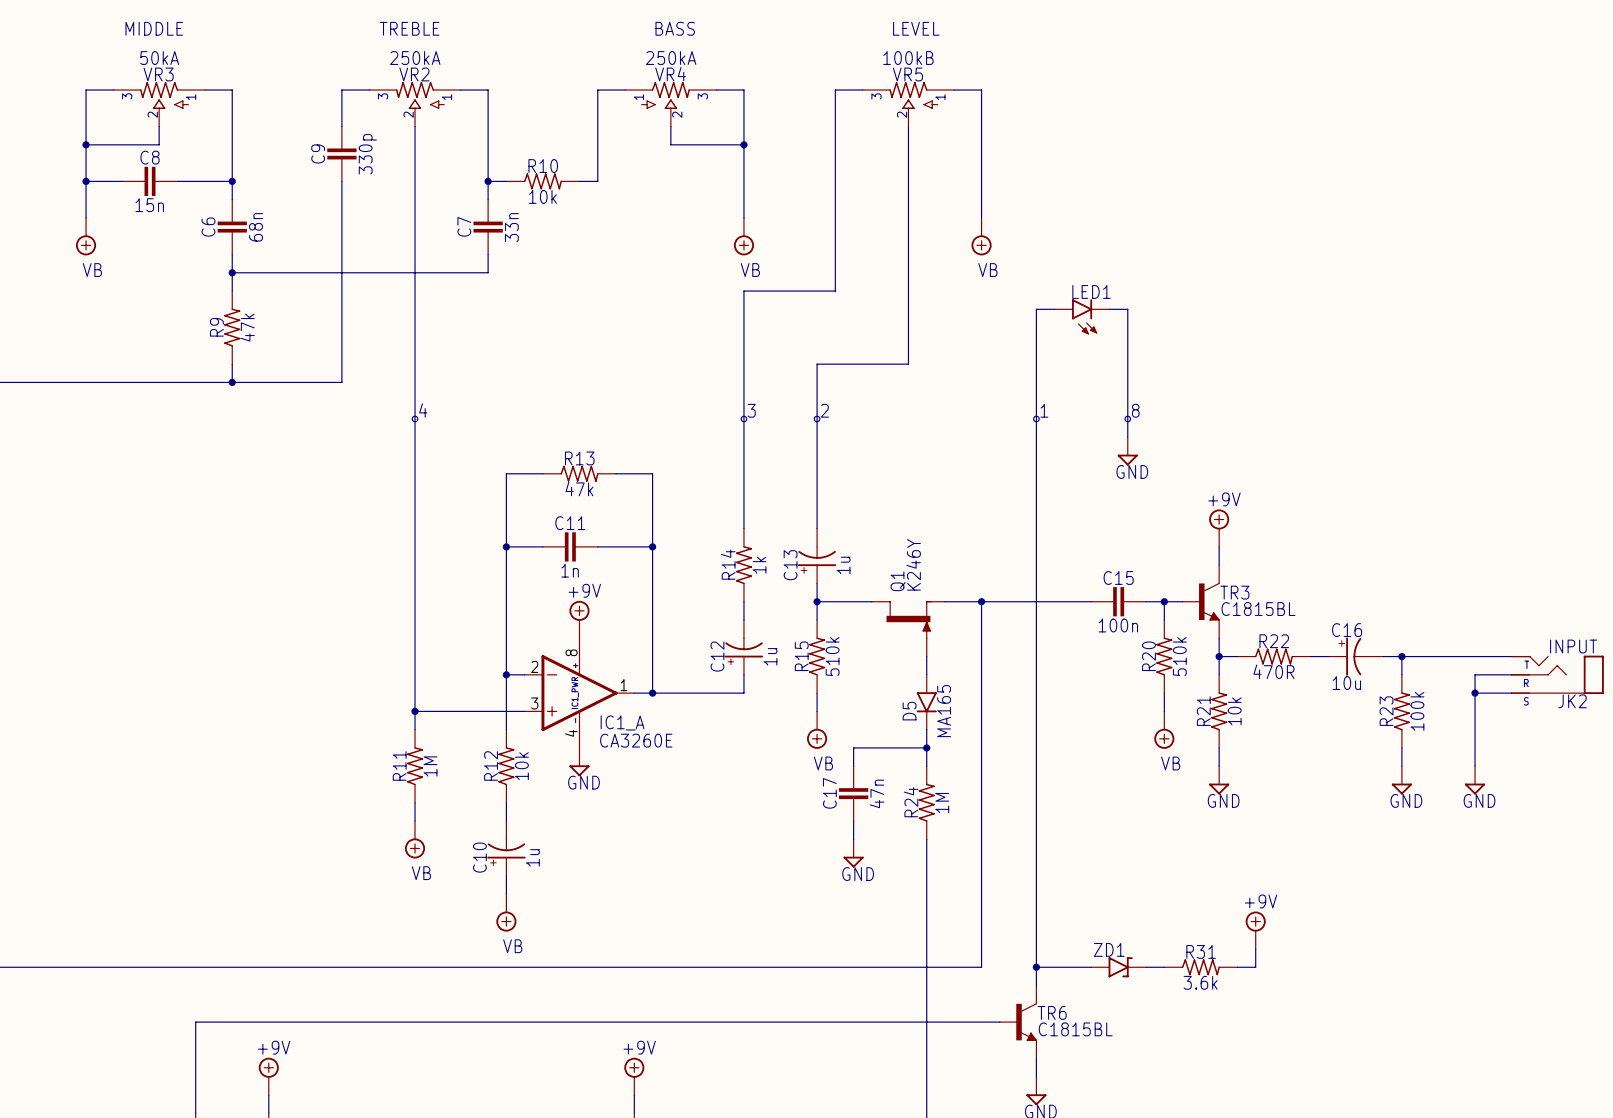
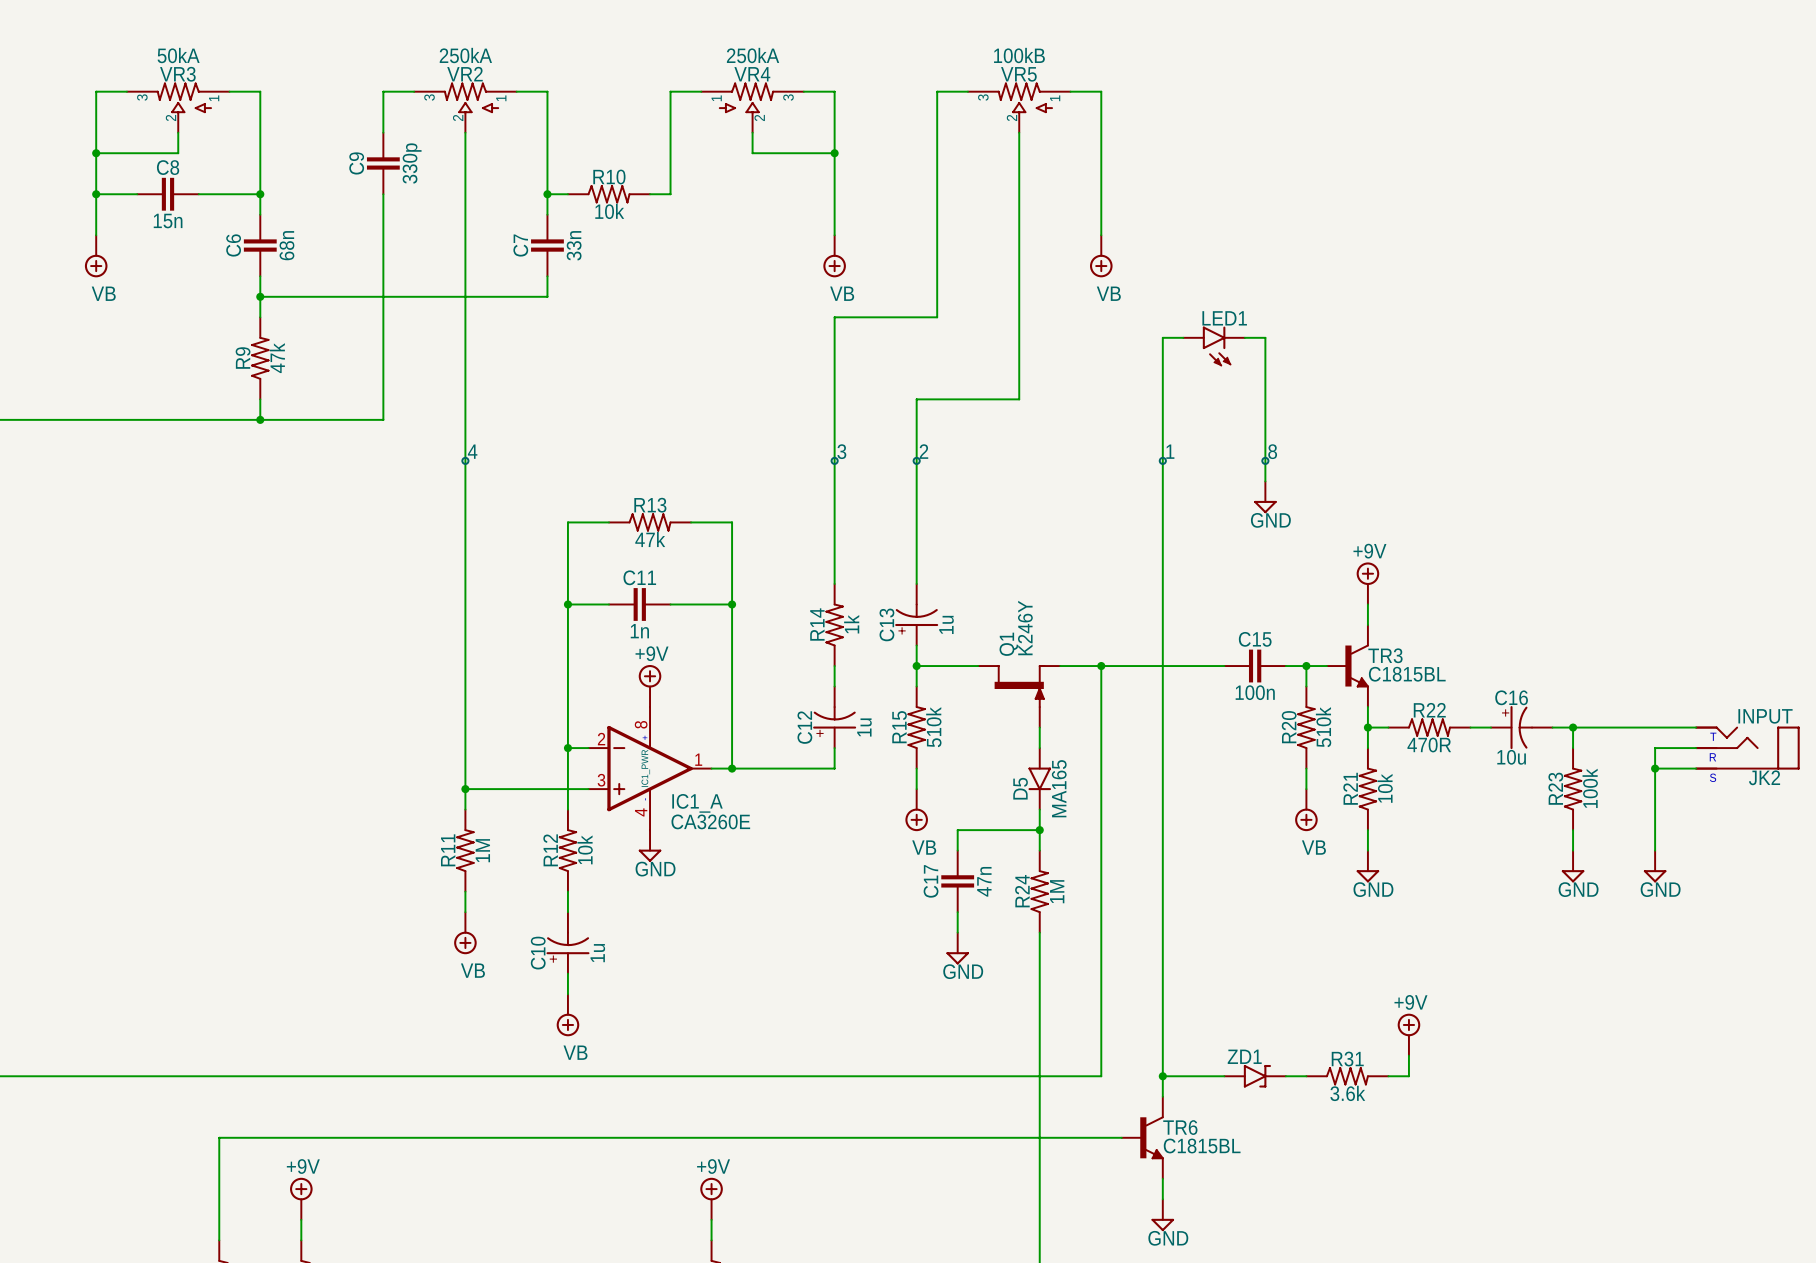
text: MIDDLE (154, 28) -> none
text: TREBLE (409, 28) -> none
text: BASS (675, 28) -> none
text: LEVEL (916, 28) -> none

